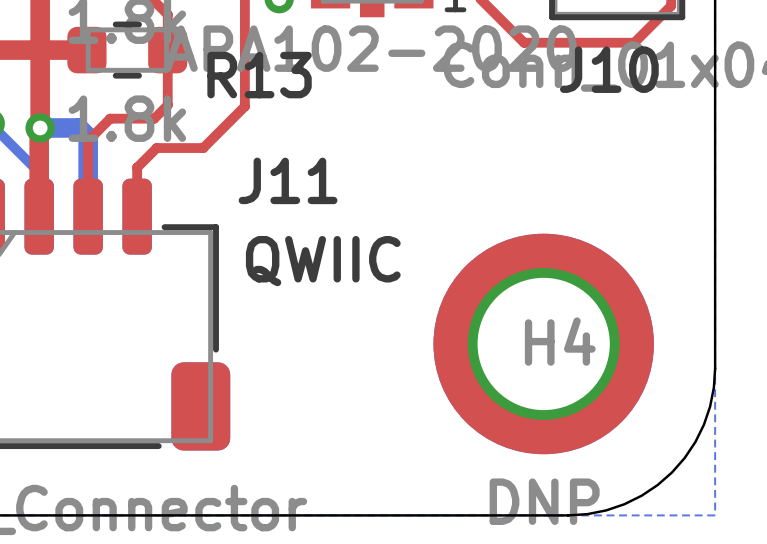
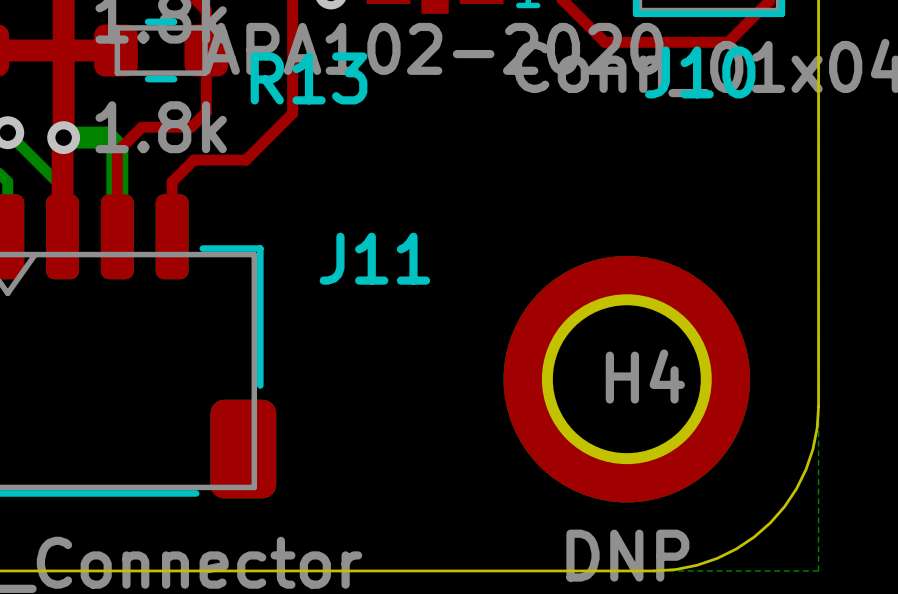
J11 name position: J11 (288, 180) -> J11 (374, 258)
text: QWIIC (323, 261) -> none

